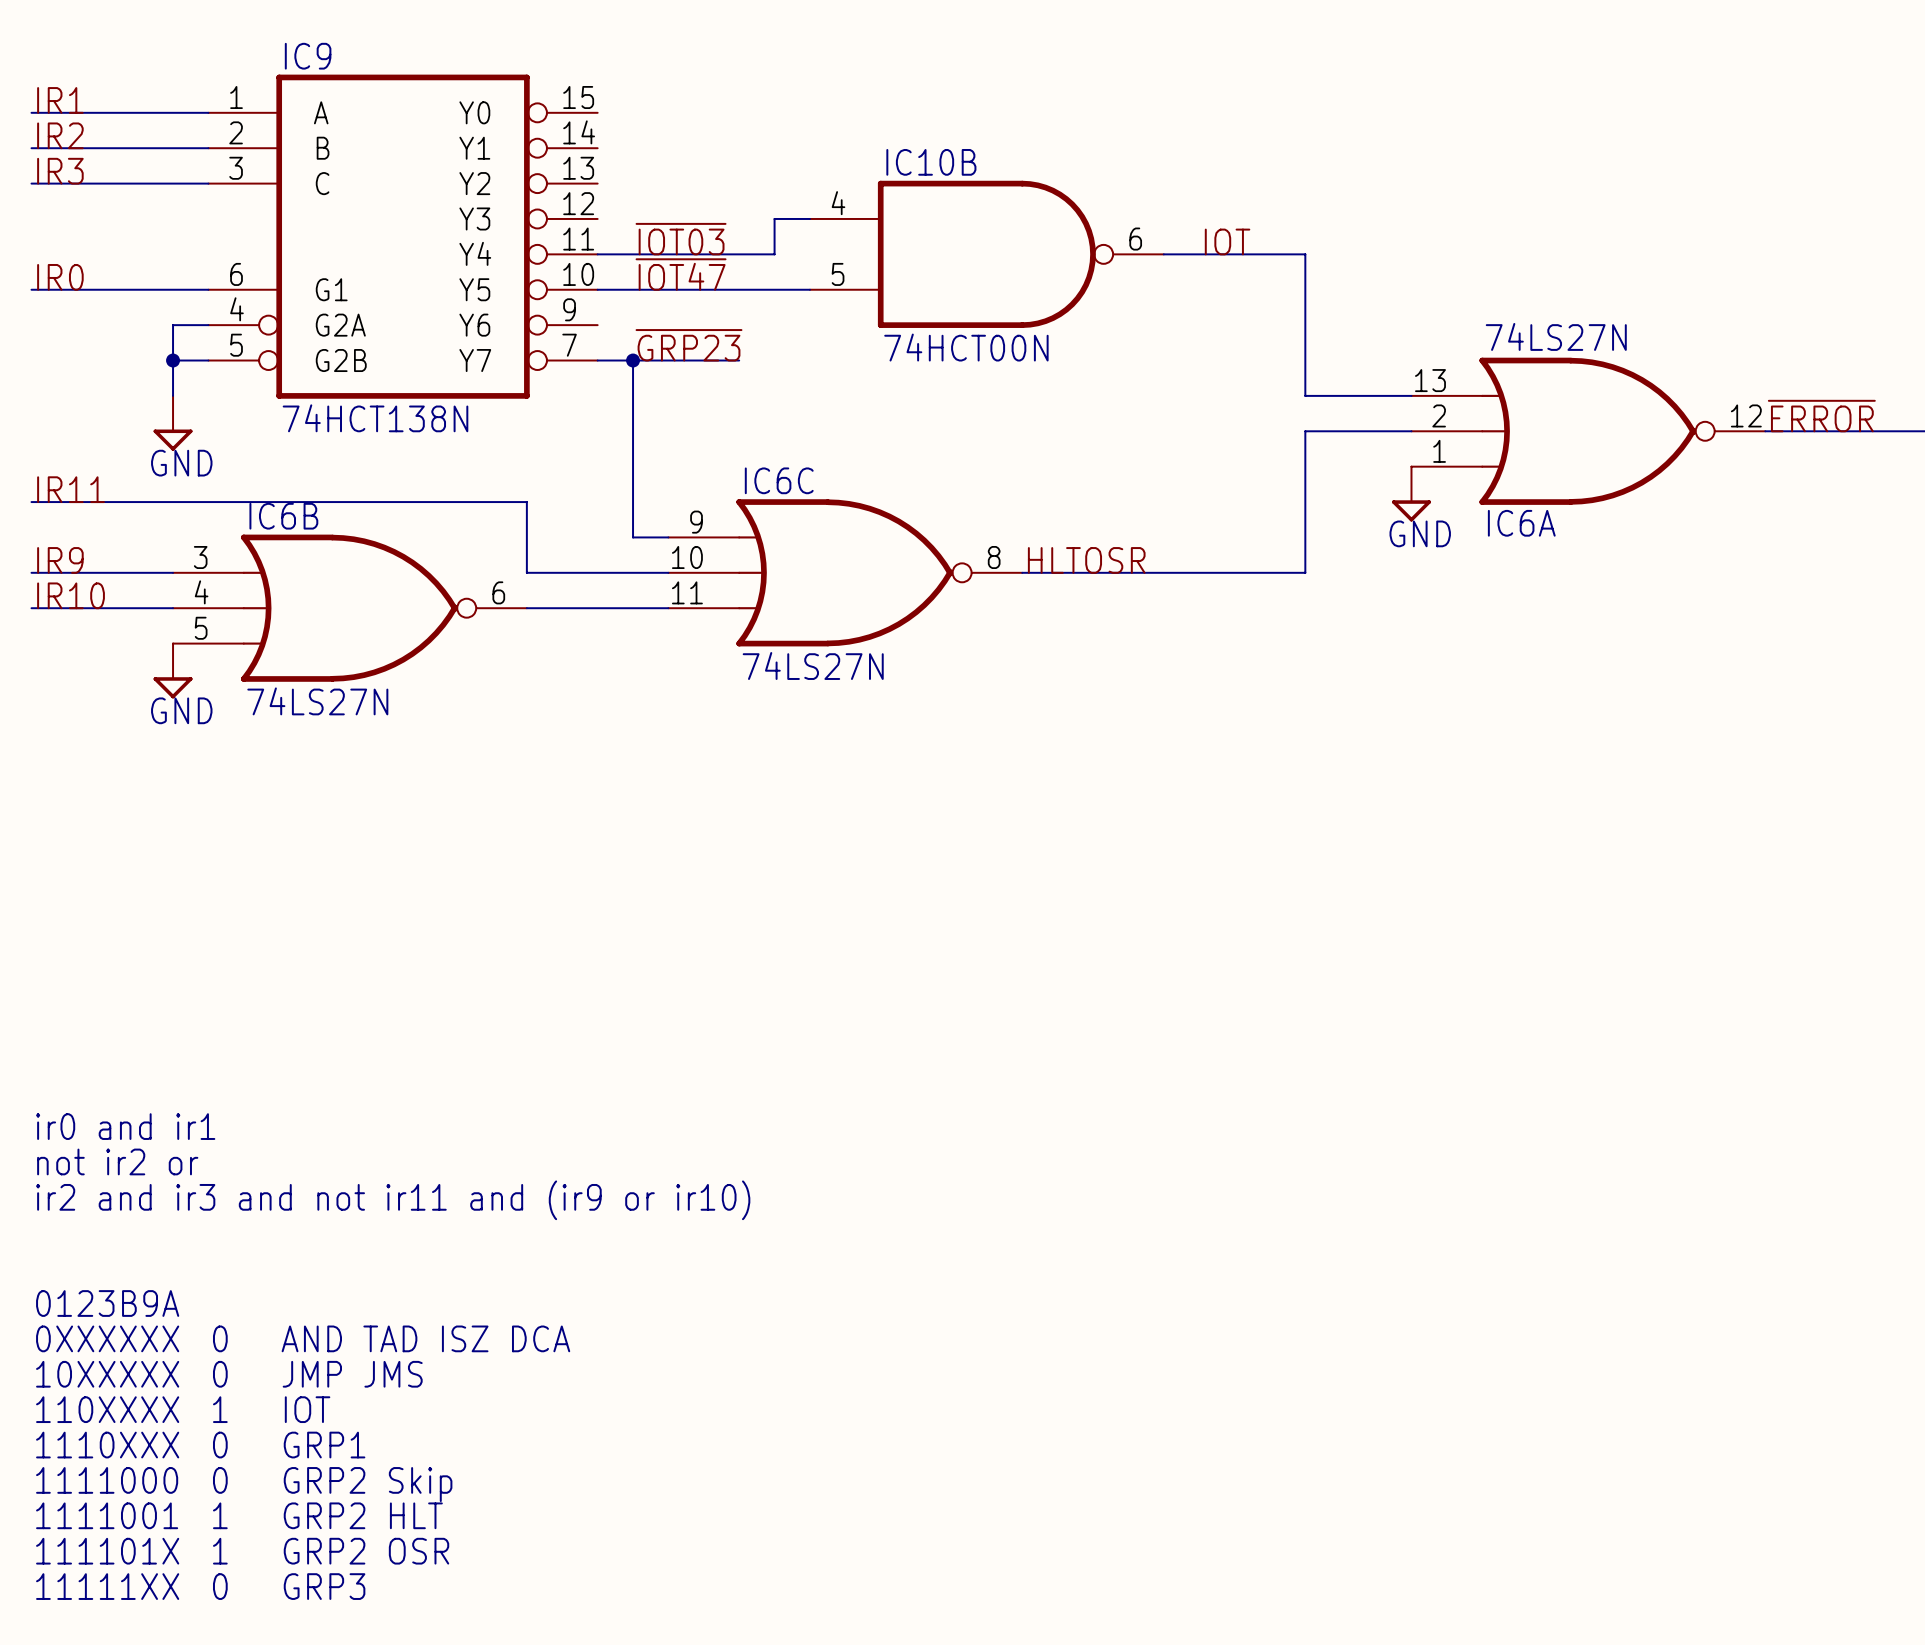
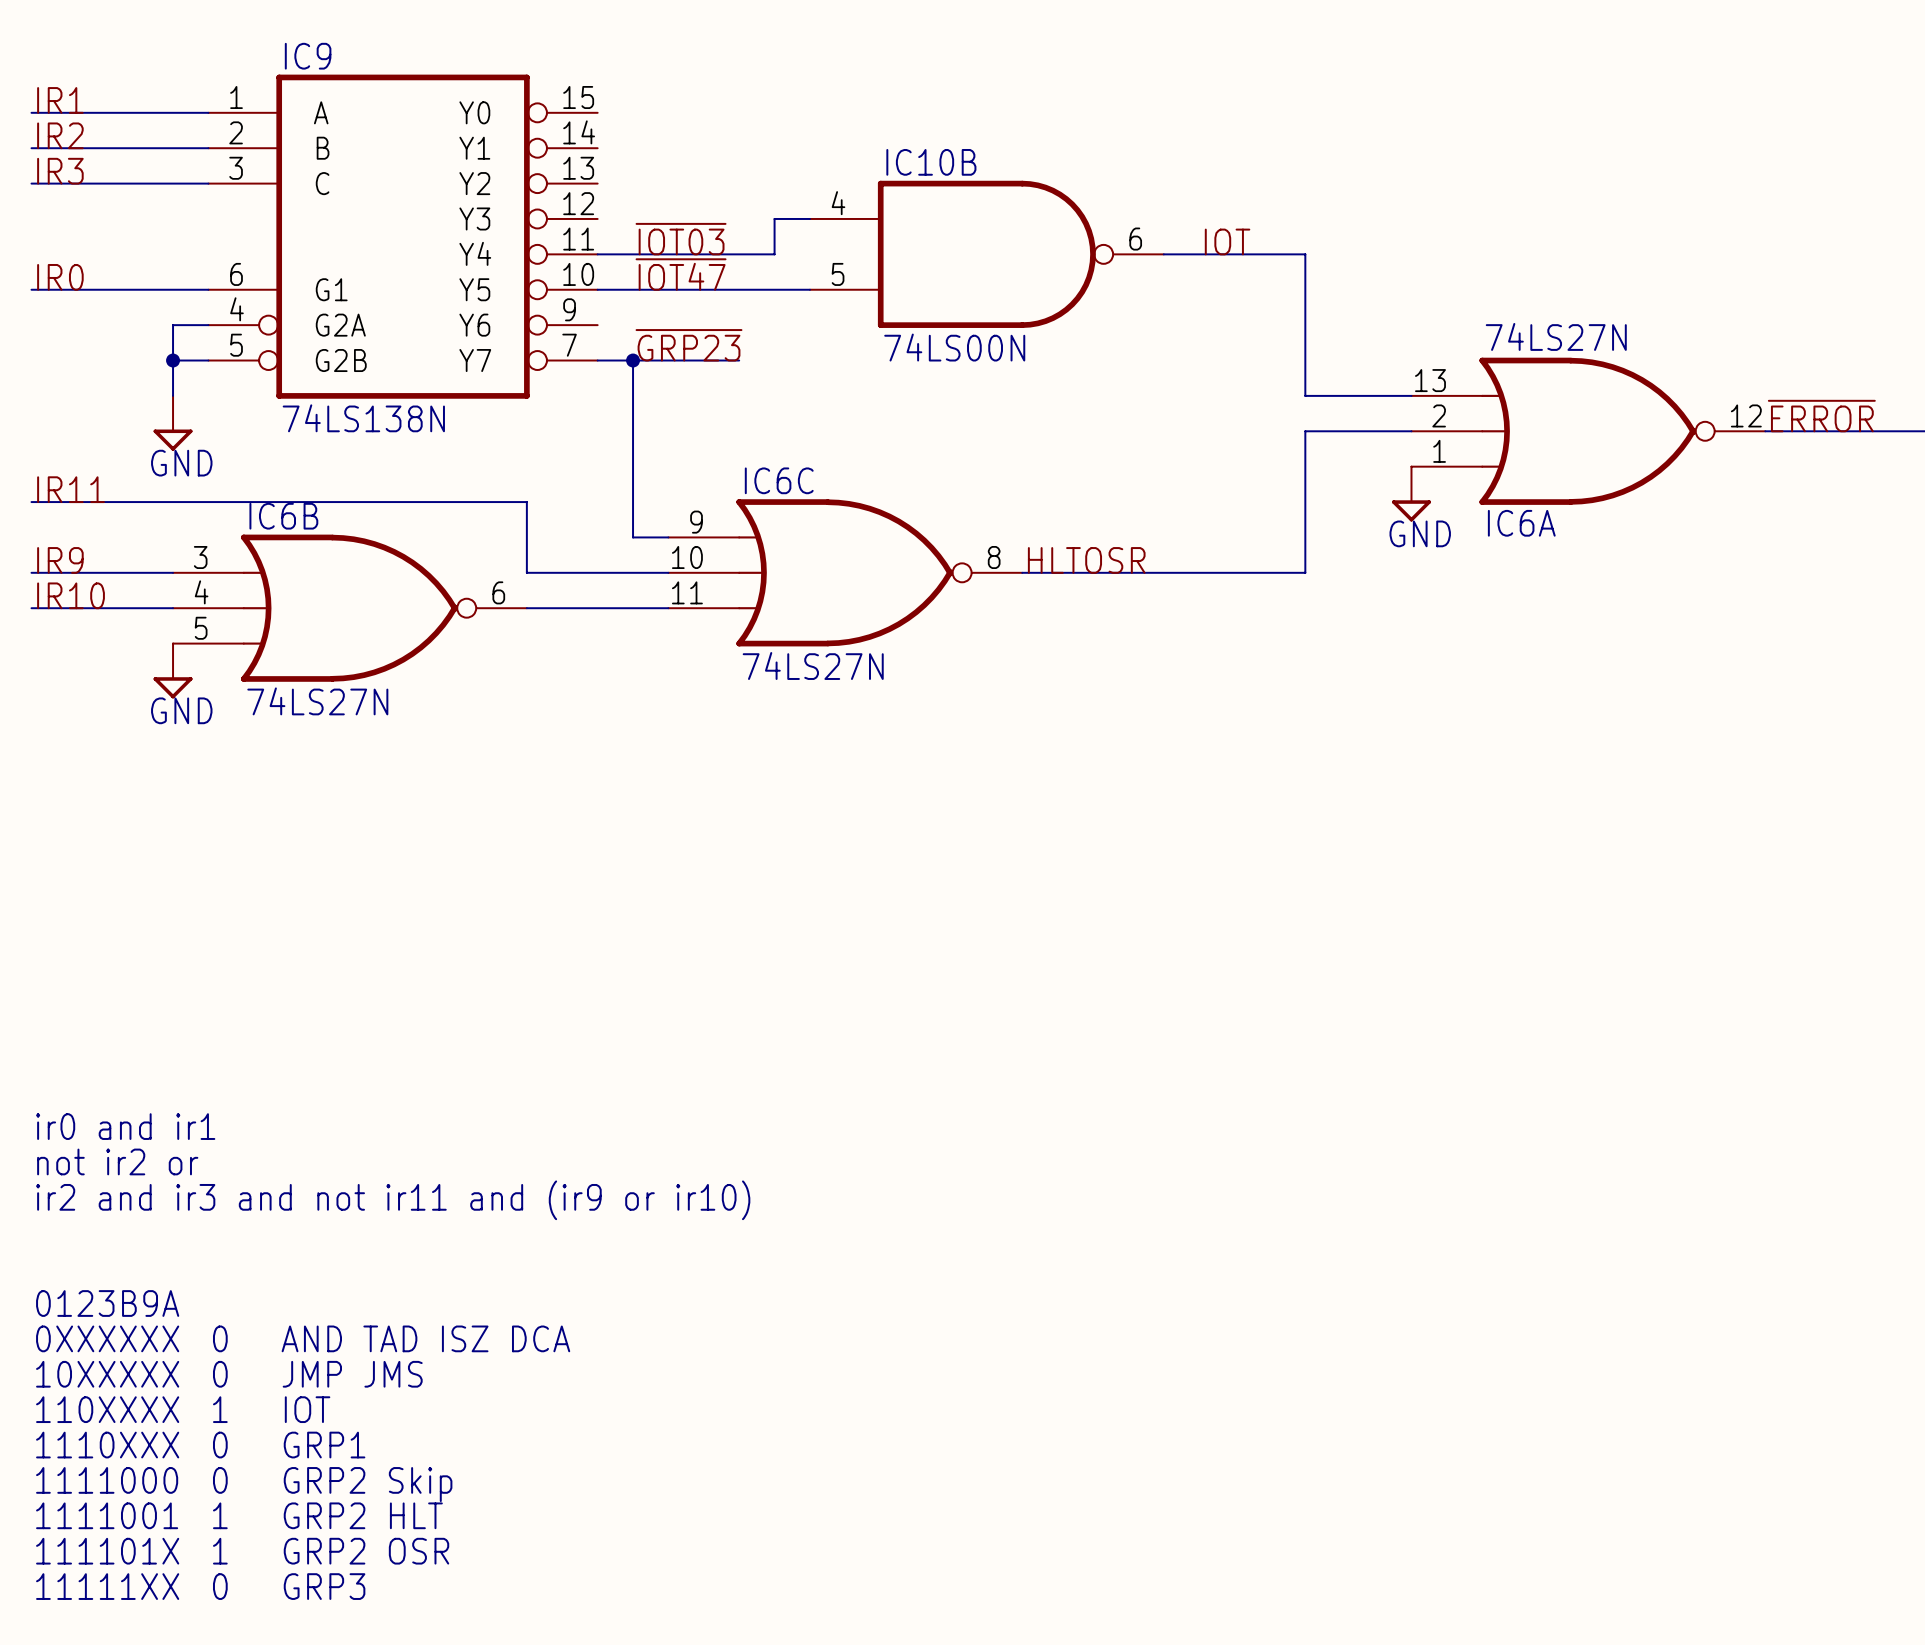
IC10B value: 74HCT00N (966, 347) -> 74LS00N (954, 347)
IC9 value: 74HCT138N (375, 418) -> 74LS138N (363, 418)

